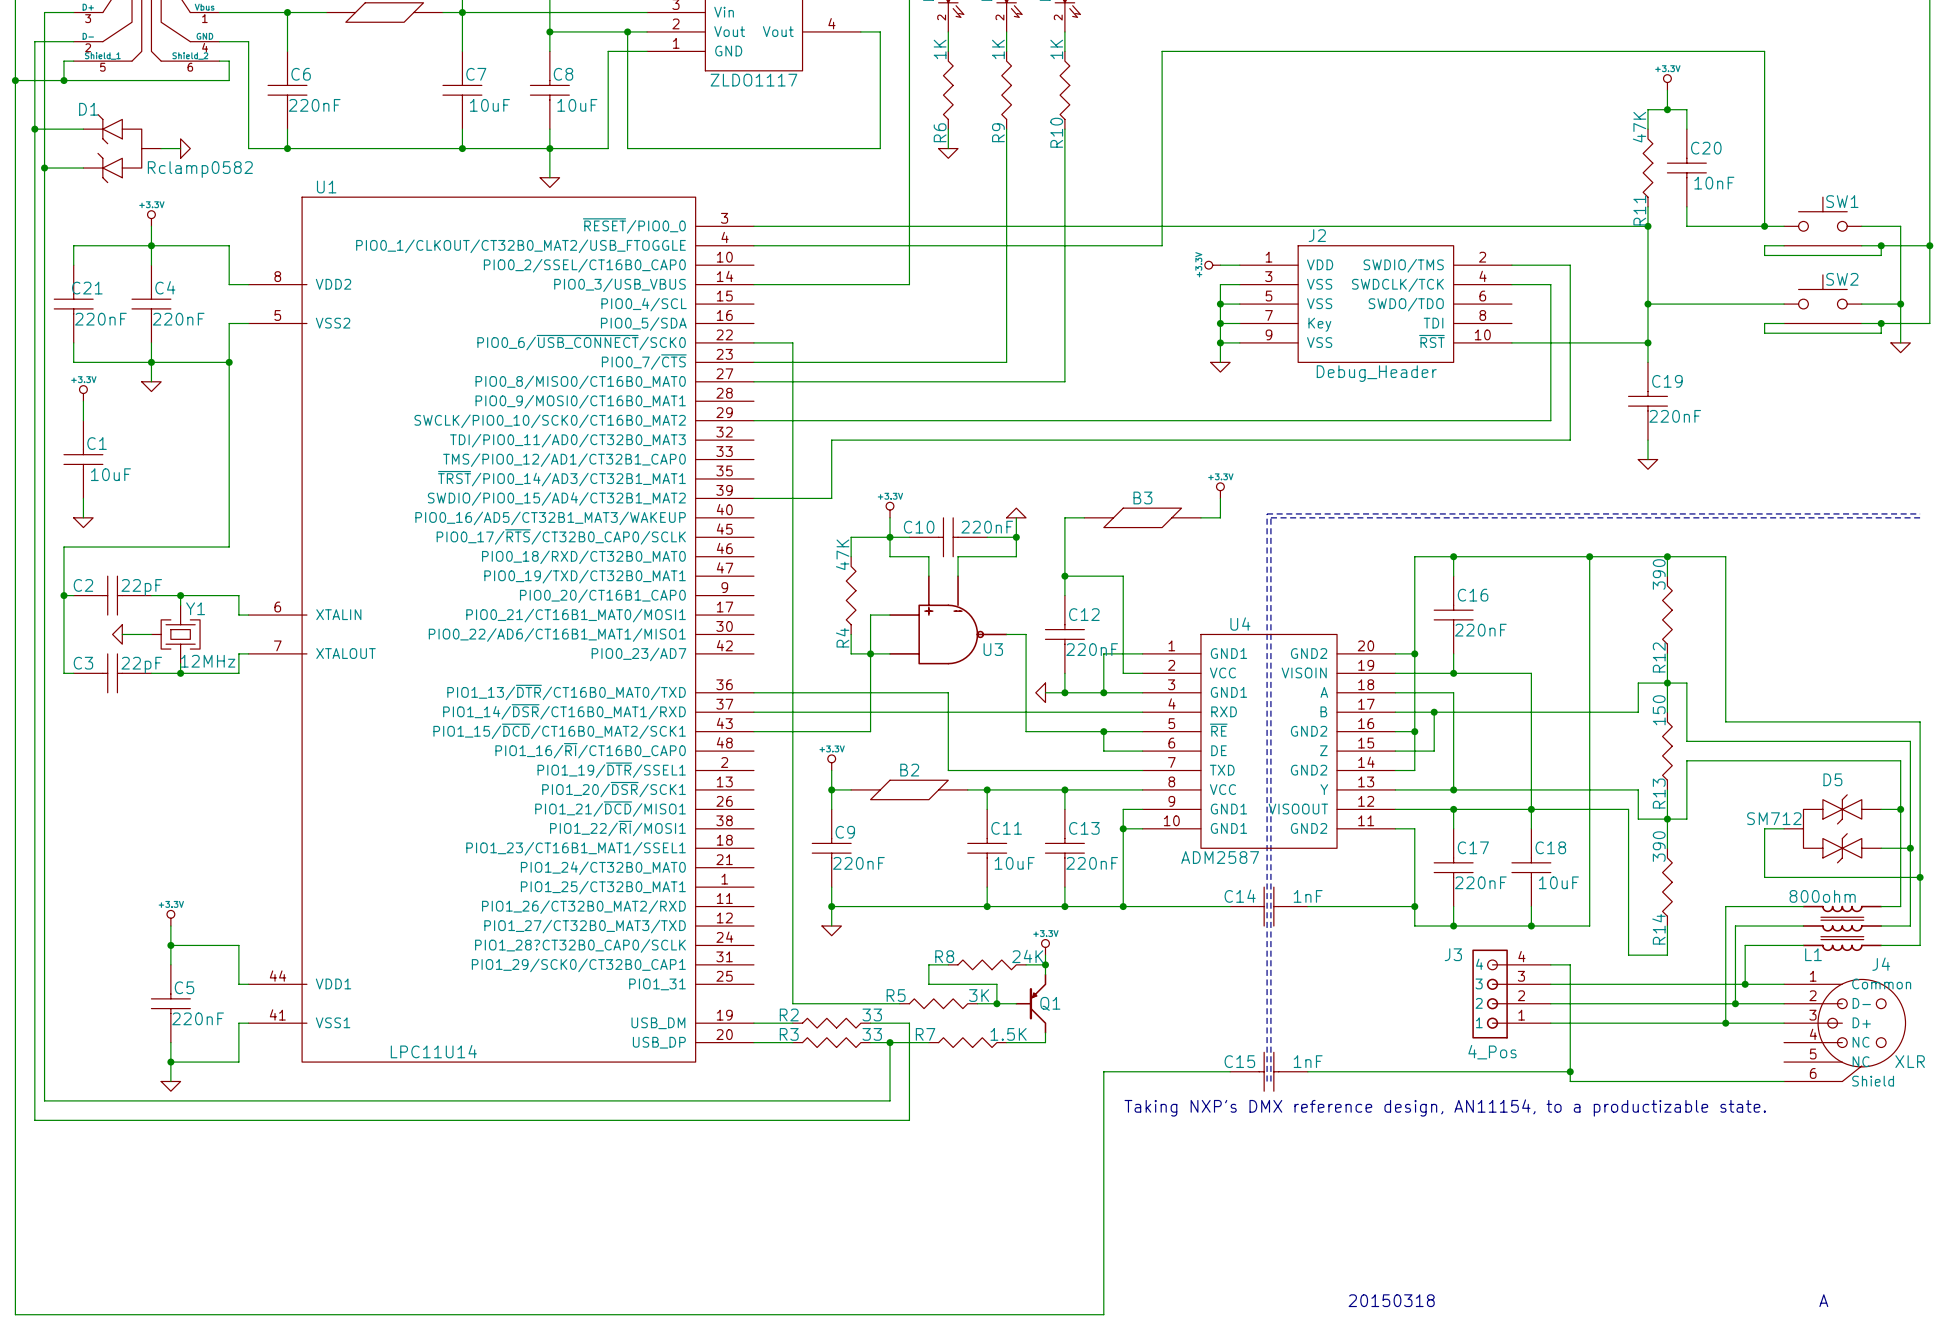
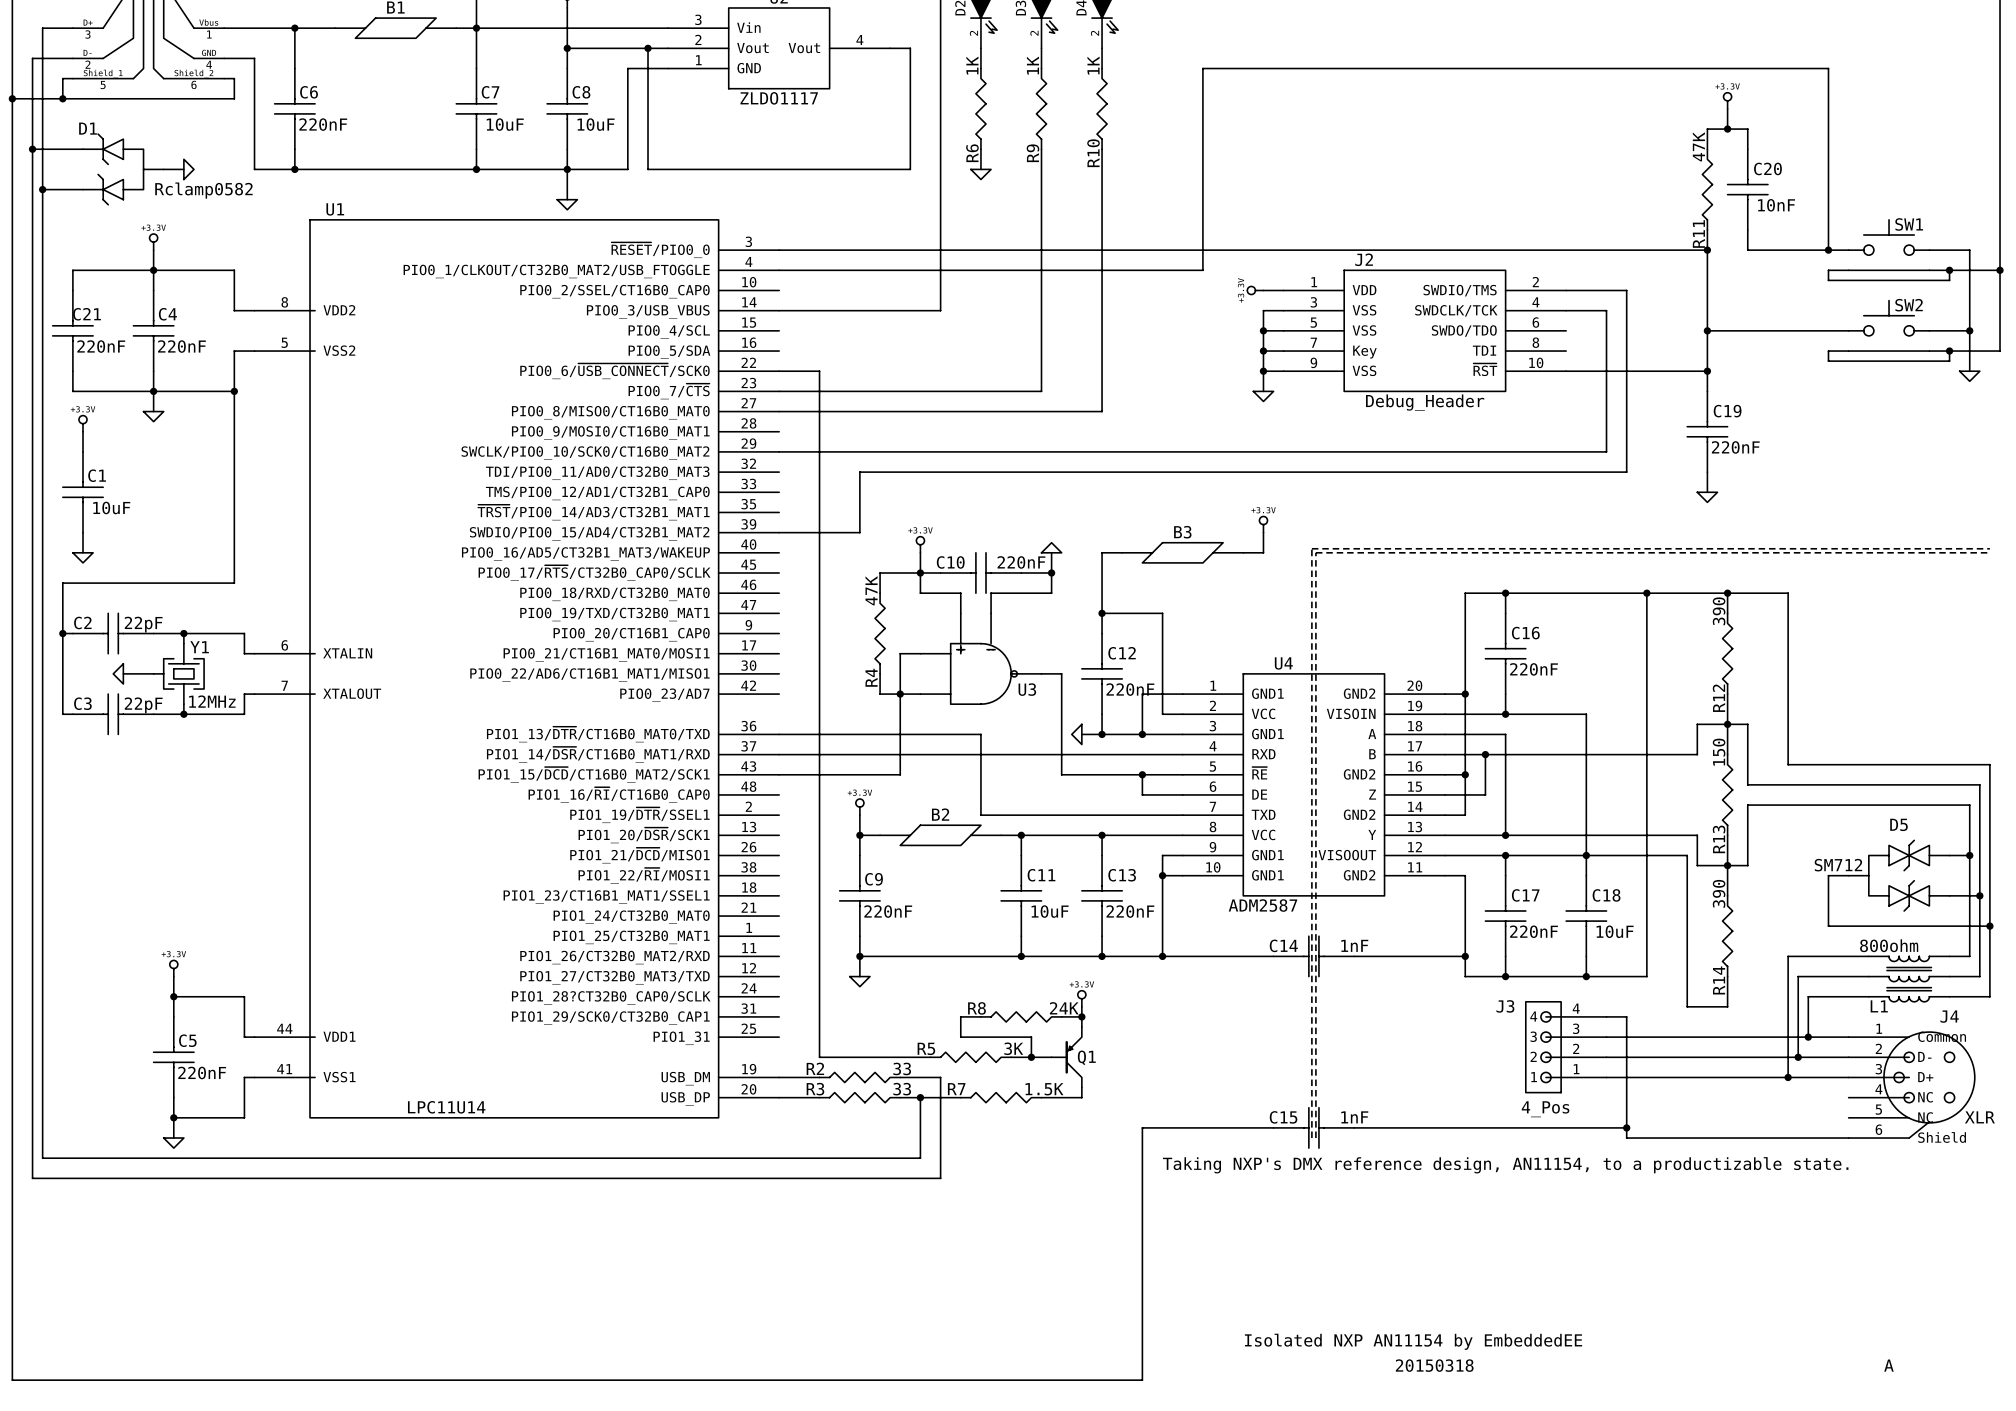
text: none -> Isolated NXP AN11154 by EmbeddedEE (1413, 1341)

